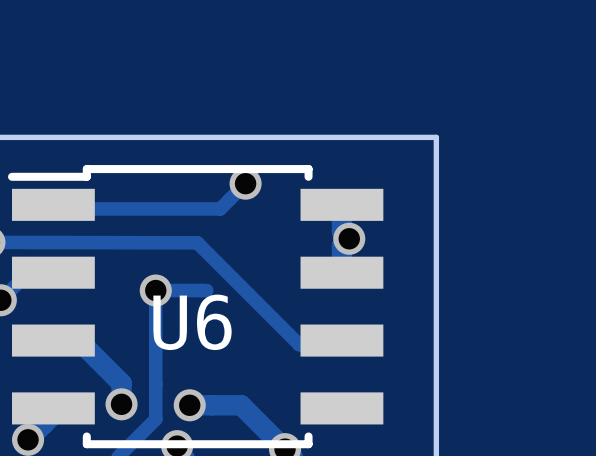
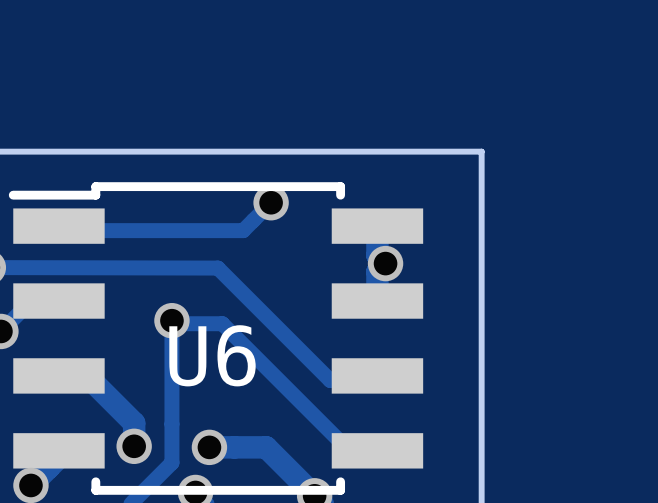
track: (155, 290) (206, 290) -> (171, 320) (174, 323) (222, 323) (349, 450) (377, 450)

